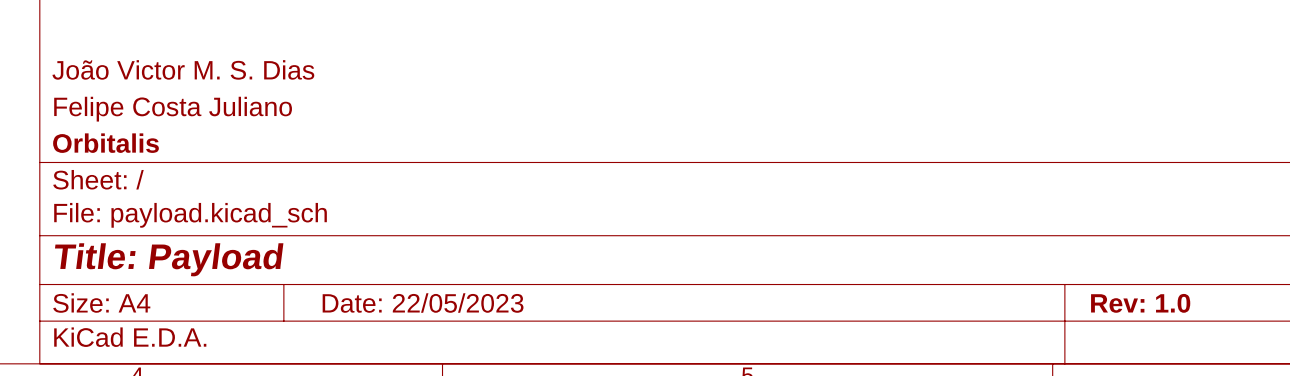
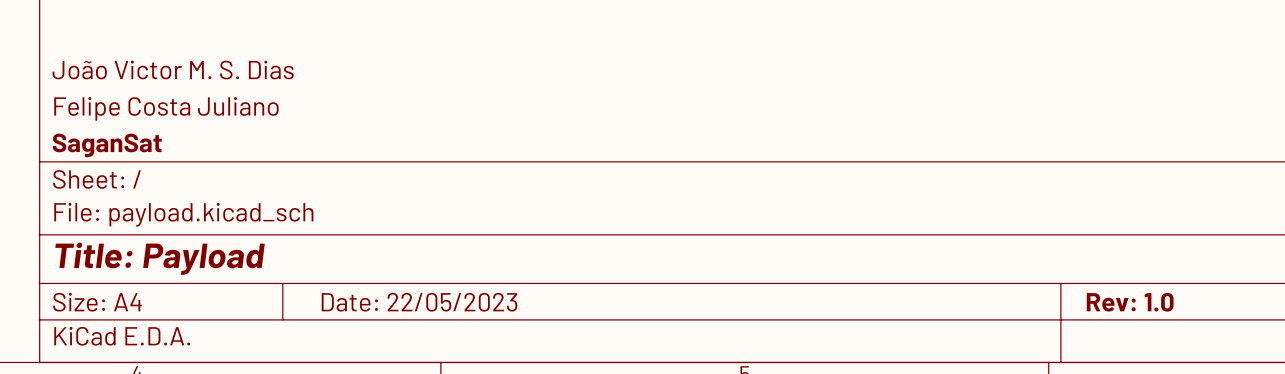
title block: Orbitalis (105, 143) -> SaganSat (107, 145)

